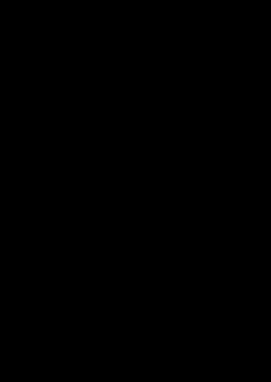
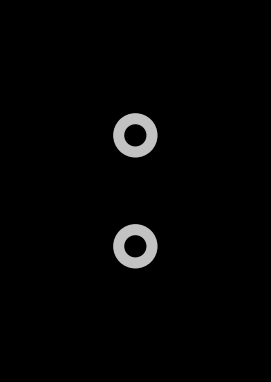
via: none -> (135, 135)
via: none -> (135, 246)

